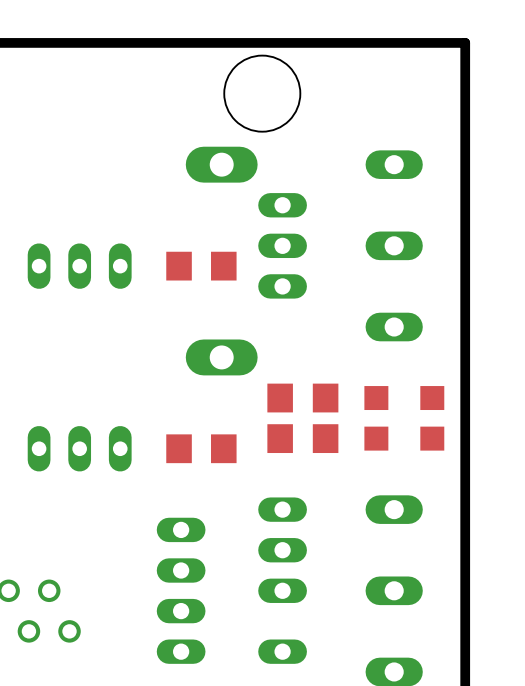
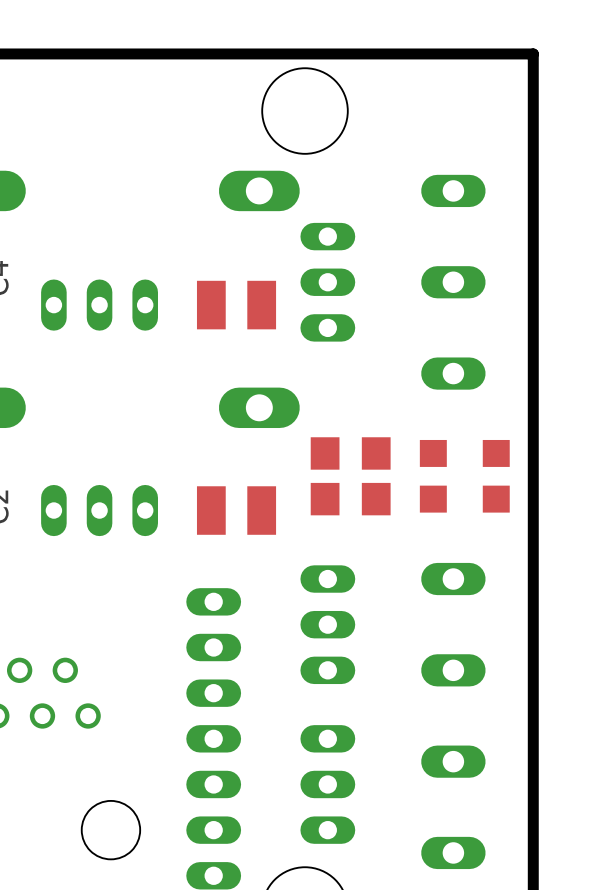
part footprint: [166, 251, 237, 281] -> [196, 280, 277, 330]
part footprint: [166, 434, 237, 464] -> [196, 486, 277, 535]

